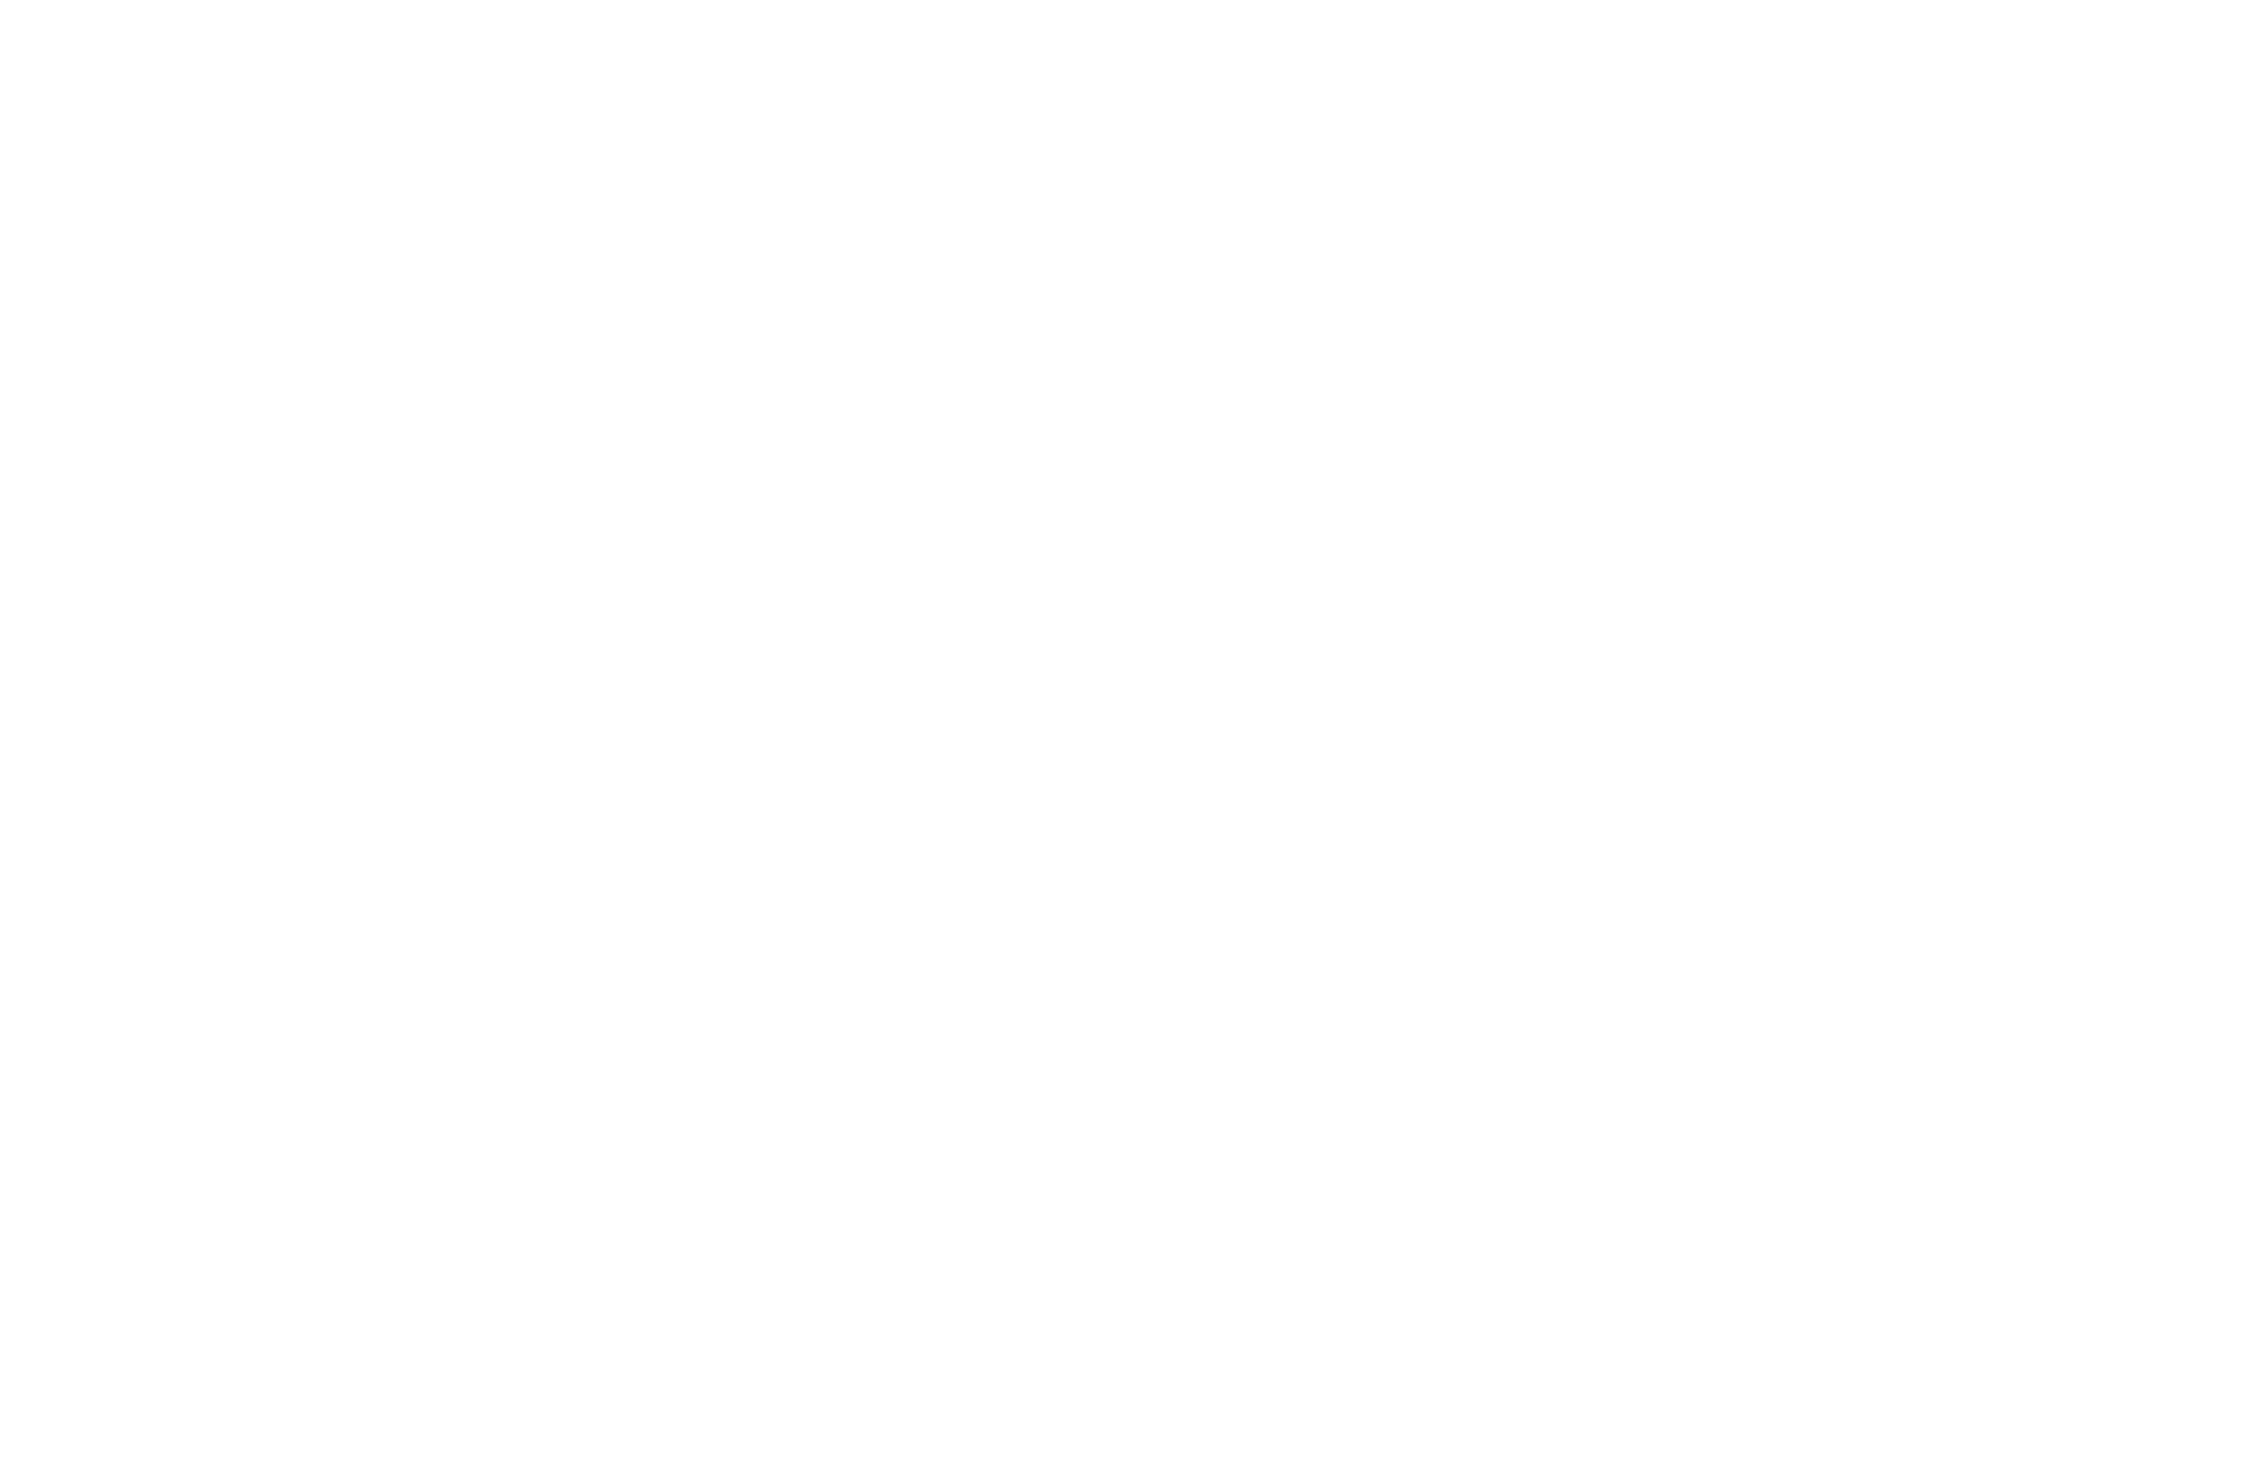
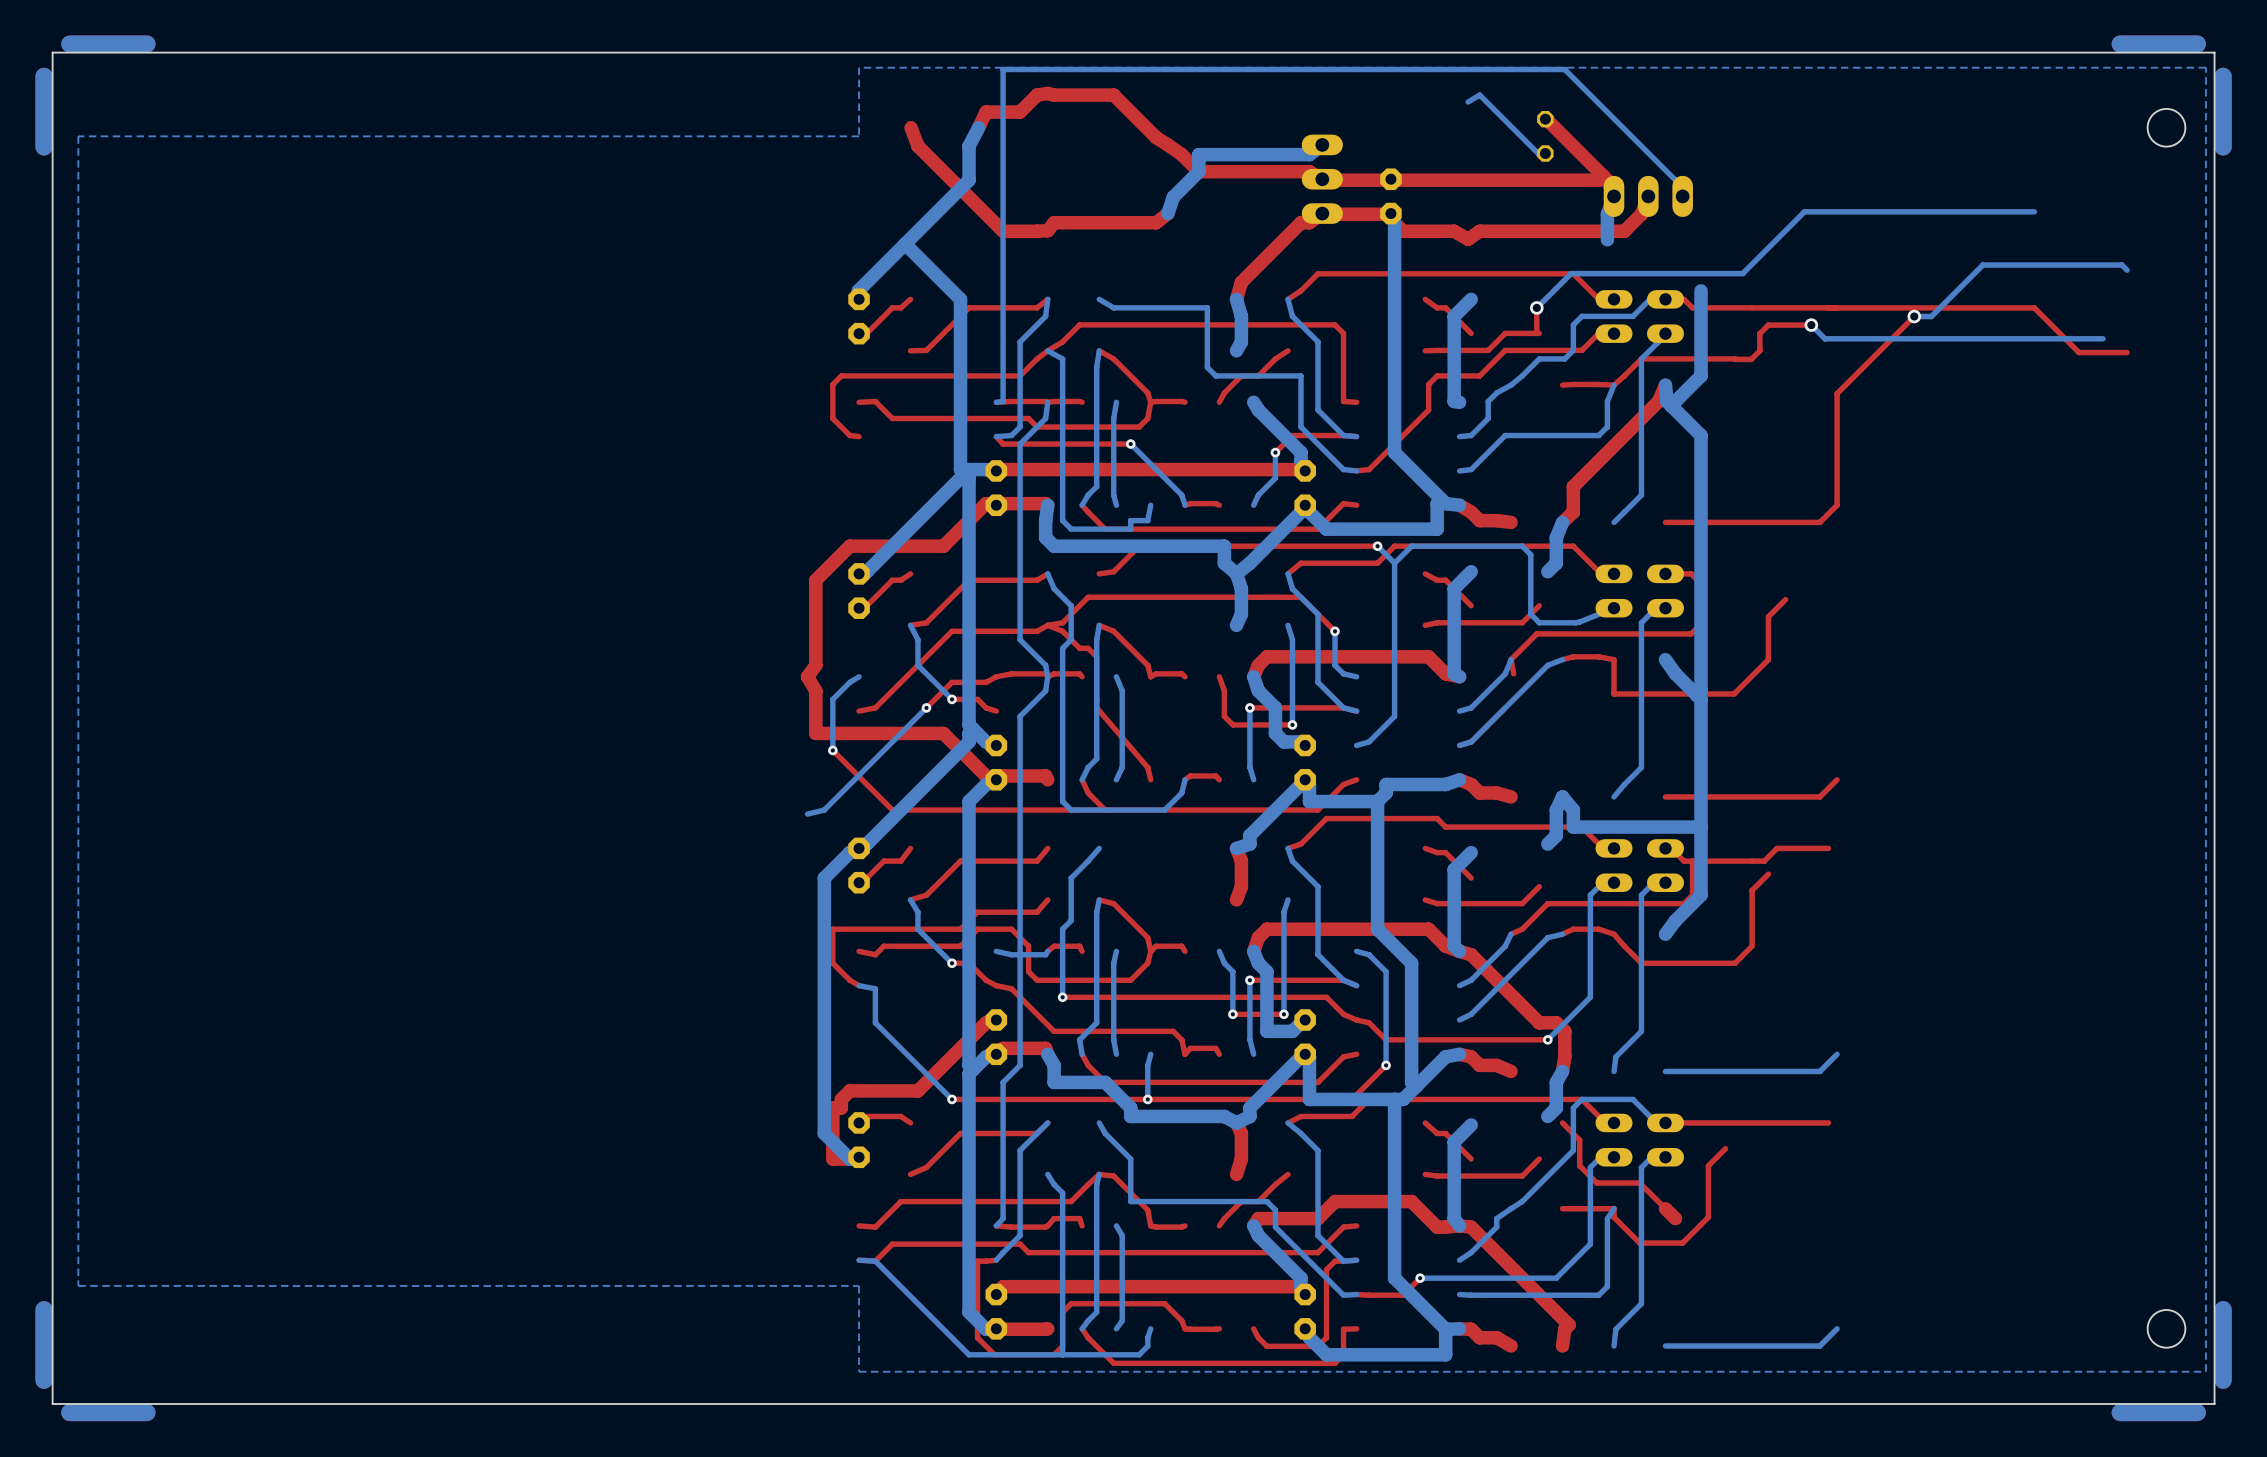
bottom zone outline: none -> (2205, 67) (2205, 1371) (859, 1371) (859, 1285) (78, 1285) (78, 136) (859, 136) (859, 67) (2205, 67)
bottom track: none -> (1468, 102) (1479, 95) (1539, 154) (1545, 153)
top track: none -> (1545, 119) (1607, 180) (1614, 196)
top track: none -> (911, 127) (917, 146) (1003, 231) (1047, 230) (1054, 222) (1156, 222) (1167, 213)
bottom track: none -> (978, 127) (969, 146) (969, 180) (858, 290) (859, 299)
top track: none -> (978, 127) (986, 112) (1020, 112) (1037, 95) (1047, 93) (1113, 95) (1156, 137) (1181, 154) (1198, 171) (1309, 171) (1322, 179) (1335, 180) (1598, 180) (1603, 175)
part: none -> (1545, 136)
bottom track: none -> (1322, 144) (1309, 154) (1198, 154) (1198, 171) (1173, 197) (1167, 213)
part: none -> (1322, 179)
part: none -> (1390, 196)
top track: none -> (1648, 196) (1641, 214) (1624, 231) (1479, 231) (1468, 239) (1454, 231) (1403, 231) (1394, 222) (1390, 213) (1322, 213) (1309, 222) (1300, 222) (1241, 282) (1236, 299)
part: none -> (1648, 196)
bottom track: none -> (1682, 196) (1675, 180) (1564, 69) (1003, 69) (1003, 401) (996, 402)
bottom track: none -> (1615, 205) (1614, 196) (1607, 214) (1607, 239)
bottom track: none -> (2034, 211) (1804, 211) (1742, 273) (1571, 273) (1536, 307)
bottom track: none -> (1390, 213) (1394, 222) (1394, 452) (1445, 503) (1459, 505)
bottom track: none -> (905, 244) (960, 299) (960, 469) (969, 478) (969, 724) (986, 741) (996, 745)
bottom track: none -> (2127, 270) (2121, 265) (1982, 265) (1931, 316) (1914, 316)
bottom track: none -> (1701, 290) (1701, 375) (1671, 405)
top track: none -> (910, 299) (900, 307) (892, 307) (866, 333) (859, 333)
bottom track: none -> (1047, 299) (1045, 316) (1020, 341) (1020, 427) (1011, 435) (996, 436)
top track: none -> (1047, 299) (1037, 307) (969, 307) (926, 350) (910, 350)
bottom track: none -> (1099, 299) (1113, 307) (1207, 307) (1207, 367) (1215, 375) (1300, 375) (1300, 427) (1343, 469) (1356, 470)
bottom track: none -> (1236, 299) (1241, 316) (1241, 341) (1236, 350)
bottom track: none -> (1288, 299) (1292, 316) (1318, 341) (1318, 410) (1343, 435) (1356, 436)
top track: none -> (1425, 299) (1437, 307) (1445, 307) (1471, 333)
bottom track: none -> (1471, 299) (1454, 316) (1454, 401) (1459, 402)
top track: none -> (1614, 299) (1598, 299) (1573, 273) (1318, 273) (1300, 290) (1288, 299)
bottom track: none -> (1665, 299) (1649, 299) (1632, 316) (1581, 316) (1573, 324) (1573, 350) (1564, 358) (1539, 358) (1522, 375) (1496, 392) (1488, 401) (1488, 418) (1471, 435) (1459, 436)
top track: none -> (1665, 299) (1684, 299) (1692, 307) (1837, 307)
top track: none -> (1536, 307) (1536, 333)
via: none -> (1536, 307)
top track: none -> (1828, 307) (2034, 307) (2079, 352) (2127, 352)
part: none -> (859, 316)
part: none -> (1614, 316)
part: none -> (1665, 316)
top track: none -> (1914, 316) (1837, 393) (1837, 505) (1819, 522) (1665, 522)
via: none -> (1914, 316)
bottom track: none -> (1811, 325) (1825, 338) (2103, 338)
top track: none -> (1811, 325) (1768, 325) (1759, 333) (1759, 350) (1751, 359) (1641, 358) (1614, 385) (1562, 385)
via: none -> (1811, 325)
top track: none -> (1539, 333) (1505, 333) (1488, 350) (1425, 350)
top track: none -> (1614, 333) (1598, 333) (1581, 350) (1505, 350) (1479, 375) (1437, 375) (1428, 384) (1428, 410) (1369, 469) (1356, 470)
bottom track: none -> (1665, 333) (1641, 358) (1641, 495) (1614, 522)
bottom track: none -> (1047, 350) (1062, 358) (1062, 520) (1071, 529) (1130, 529) (1130, 520) (1147, 520) (1150, 505)
bottom track: none -> (1099, 350) (1096, 367) (1096, 486) (1082, 505)
top track: none -> (1099, 350) (1113, 358) (1147, 392) (1150, 402)
top track: none -> (1288, 350) (1275, 358) (1258, 375) (1241, 375) (1224, 392) (1219, 402)
bottom track: none -> (1614, 385) (1607, 401) (1607, 426) (1598, 435) (1505, 435) (1471, 469) (1459, 470)
bottom track: none -> (1665, 385) (1666, 401) (1701, 435) (1701, 690) (1696, 695)
top track: none -> (1665, 385) (1658, 401) (1573, 486) (1573, 512) (1562, 522)
bottom track: none -> (1047, 402) (1045, 418) (1020, 444) (1020, 639) (1045, 665) (1047, 676) (1045, 690) (1020, 716) (1020, 1065) (1003, 1082) (1003, 1218) (996, 1225)
top track: none -> (1082, 402) (996, 402)
bottom track: none -> (1116, 402) (1113, 418) (1113, 495) (1116, 505)
top track: none -> (1150, 402) (1147, 418) (1139, 427) (1037, 427) (1028, 418) (892, 418) (875, 401) (859, 402)
top track: none -> (1185, 402) (1150, 402)
bottom track: none -> (1253, 402) (1258, 410) (1300, 452) (1300, 461) (1305, 470)
top track: none -> (1356, 402) (1343, 401) (1343, 333) (1334, 324) (1079, 324) (1062, 341) (1037, 358) (1020, 375) (841, 375) (832, 384) (832, 418) (849, 435) (859, 436)
top track: none -> (996, 436) (1003, 444) (1130, 444)
top track: none -> (1356, 436) (1292, 435) (1275, 452)
bottom track: none -> (1130, 444) (1181, 495) (1185, 505)
via: none -> (1130, 444)
bottom track: none -> (1275, 452) (1275, 478) (1258, 495) (1253, 505)
via: none -> (1275, 452)
bottom track: none -> (996, 470) (969, 469) (866, 571) (859, 573)
top track: none -> (1305, 470) (996, 470)
part: none -> (996, 488)
part: none -> (1305, 488)
bottom track: none -> (1441, 499) (1437, 503) (1437, 529) (1326, 529) (1305, 505) (1300, 512) (1249, 563) (1236, 573)
bottom track: none -> (1047, 505) (1045, 537) (1054, 546) (1224, 546) (1224, 563) (1236, 573)
top track: none -> (1047, 505) (1045, 503) (996, 505) (986, 503) (943, 546) (849, 546) (815, 580) (815, 665) (807, 676) (815, 690) (815, 733) (943, 733) (986, 776) (996, 779) (1003, 776) (1045, 776) (1047, 779)
top track: none -> (1219, 505) (1215, 503) (1185, 505)
top track: none -> (1356, 505) (1343, 503) (1318, 529) (1105, 529) (1082, 505)
top track: none -> (1459, 505) (1471, 512) (1479, 520) (1511, 522)
bottom track: none -> (1562, 522) (1556, 537) (1556, 563) (1547, 571)
bottom track: none -> (1377, 546) (1394, 563)
top track: none -> (1377, 546) (1139, 546) (1113, 571) (1099, 573)
via: none -> (1377, 546)
bottom track: none -> (1394, 563) (1394, 716) (1369, 741) (1356, 745)
bottom track: none -> (1394, 563) (1411, 546) (1522, 546) (1530, 554) (1530, 614) (1539, 622) (1579, 622) (1614, 608)
bottom track: none -> (1471, 571) (1454, 588) (1454, 673) (1459, 676)
top track: none -> (910, 573) (900, 580) (892, 580) (866, 605) (859, 608)
bottom track: none -> (1047, 573) (1054, 588) (1071, 605) (1071, 639) (1062, 648) (1062, 801) (1071, 810) (1164, 810) (1181, 793) (1185, 779)
top track: none -> (1047, 573) (1037, 580) (969, 580) (926, 622) (910, 625)
bottom track: none -> (1236, 573) (1241, 588) (1241, 614) (1236, 625)
bottom track: none -> (1288, 573) (1292, 588) (1318, 614) (1318, 682) (1343, 707) (1356, 711)
top track: none -> (1425, 573) (1437, 580) (1445, 580) (1471, 605)
top track: none -> (1614, 573) (1598, 571) (1573, 546) (1394, 546) (1377, 563) (1300, 563) (1288, 573)
top track: none -> (1665, 573) (1691, 573) (1699, 582) (1699, 625) (1691, 633) (1536, 633) (1511, 659) (1513, 673)
part: none -> (859, 591)
part: none -> (1614, 591)
part: none -> (1665, 591)
top track: none -> (1785, 599) (1768, 616) (1768, 659) (1734, 693) (1614, 693) (1614, 659) (1598, 656) (1573, 656) (1562, 659)
top track: none -> (1539, 605) (1522, 622) (1437, 622) (1425, 625)
bottom track: none -> (1665, 608) (1649, 614) (1641, 622) (1641, 767) (1614, 796)
bottom track: none -> (910, 625) (917, 639) (917, 665) (952, 699)
top track: none -> (1047, 625) (1037, 631) (952, 631) (875, 707) (859, 711)
top track: none -> (1047, 625) (1062, 631) (1079, 648) (1088, 648) (1096, 656) (1096, 699)
top track: none -> (1047, 625) (1062, 622) (1088, 597) (1300, 597) (1335, 631)
bottom track: none -> (1099, 625) (1096, 639) (1096, 758) (1088, 767) (1082, 779)
top track: none -> (1099, 625) (1113, 631) (1147, 665) (1150, 676) (1156, 673) (1181, 673) (1185, 676)
bottom track: none -> (1288, 625) (1292, 639) (1292, 724)
bottom track: none -> (1335, 631) (1335, 665) (1343, 673) (1356, 676)
via: none -> (1335, 631)
bottom track: none -> (1511, 659) (1505, 673) (1471, 707) (1459, 711)
bottom track: none -> (1562, 659) (1547, 665) (1471, 741) (1459, 745)
bottom track: none -> (1665, 659) (1675, 673) (1701, 699) (1701, 895) (1675, 920) (1665, 934)
bottom track: none -> (859, 676) (849, 682) (832, 699) (832, 750)
top track: none -> (1082, 676) (1079, 673) (1054, 673) (1047, 676) (1045, 673) (1011, 673) (996, 676) (986, 682) (952, 682) (926, 707)
bottom track: none -> (1116, 676) (1122, 690) (1122, 767) (1116, 779)
top track: none -> (1219, 676) (1224, 690) (1224, 716) (1232, 724) (1292, 724)
bottom track: none -> (1253, 676) (1258, 690) (1275, 707) (1275, 733) (1283, 741) (1300, 741) (1305, 745)
top track: none -> (1459, 676) (1445, 673) (1428, 656) (1266, 656) (1258, 665) (1253, 676)
top track: none -> (952, 699) (977, 699) (986, 707) (996, 711)
via: none -> (952, 699)
top track: none -> (1096, 699) (1096, 707) (1147, 767) (1150, 779)
bottom track: none -> (926, 707) (824, 810) (807, 814)
via: none -> (926, 707)
bottom track: none -> (1249, 707) (1249, 767) (1253, 779)
top track: none -> (1249, 707) (1343, 707) (1356, 711)
via: none -> (1249, 707)
via: none -> (1292, 724)
part: none -> (1133, 728)
bottom track: none -> (973, 729) (969, 733) (969, 741) (866, 844) (849, 852) (824, 878) (824, 1133) (849, 1159) (859, 1157)
top track: none -> (832, 750) (892, 810) (1318, 810) (1343, 784) (1356, 779)
via: none -> (832, 750)
part: none -> (996, 762)
part: none -> (1305, 762)
bottom track: none -> (996, 779) (986, 784) (969, 801) (969, 1065) (973, 1069)
top track: none -> (1082, 779) (1088, 793) (1105, 810)
top track: none -> (1219, 779) (1215, 776) (1190, 776) (1185, 779)
bottom track: none -> (1459, 779) (1445, 784) (1386, 784) (1386, 793) (1377, 801)
top track: none -> (1459, 779) (1471, 784) (1479, 793) (1496, 793) (1511, 796)
top track: none -> (1837, 779) (1819, 796) (1665, 796)
bottom track: none -> (1377, 801) (1309, 801) (1309, 784) (1305, 779) (1249, 835) (1249, 844) (1236, 848)
bottom track: none -> (1377, 801) (1377, 929) (1411, 963) (1411, 1082) (1415, 1086)
bottom track: none -> (1701, 827) (1573, 827) (1573, 810) (1562, 796) (1556, 810) (1556, 835) (1547, 844)
top track: none -> (910, 848) (900, 861) (883, 861) (866, 878) (859, 882)
top track: none -> (1047, 848) (1037, 861) (960, 861) (926, 895) (910, 899)
bottom track: none -> (1099, 848) (1071, 878) (1071, 920) (1062, 929) (1062, 997)
top track: none -> (1236, 848) (1241, 861) (1241, 886) (1236, 899)
bottom track: none -> (1288, 848) (1292, 861) (1318, 886) (1318, 954) (1343, 980) (1356, 985)
top track: none -> (1425, 848) (1437, 852) (1445, 852) (1471, 878)
top track: none -> (1614, 848) (1598, 844) (1581, 827) (1445, 827) (1437, 818) (1326, 818) (1300, 844) (1288, 848)
top track: none -> (1828, 848) (1777, 848) (1764, 861) (1684, 861) (1675, 852) (1665, 848)
bottom track: none -> (1471, 852) (1454, 869) (1454, 946) (1459, 951)
top track: none -> (1692, 861) (1692, 895) (1683, 903) (1547, 903) (1522, 929) (1511, 934)
part: none -> (859, 865)
part: none -> (1614, 865)
part: none -> (1665, 865)
top track: none -> (1768, 874) (1752, 890) (1752, 946) (1735, 963) (1641, 963) (1614, 934) (1598, 929) (1573, 929) (1562, 934)
bottom track: none -> (1614, 882) (1598, 886) (1590, 895) (1590, 997) (1547, 1039)
bottom track: none -> (1665, 882) (1649, 886) (1641, 895) (1641, 1031) (1615, 1056) (1614, 1071)
top track: none -> (1539, 886) (1522, 903) (1437, 903) (1425, 899)
bottom track: none -> (910, 899) (917, 912) (917, 929) (952, 963)
top track: none -> (1047, 899) (1037, 912) (977, 912) (960, 929) (832, 929) (832, 963) (849, 980) (859, 985)
bottom track: none -> (1099, 899) (1096, 912) (1096, 1022) (1079, 1039) (1082, 1054)
top track: none -> (1099, 899) (1113, 903) (1147, 937) (1150, 951)
bottom track: none -> (1288, 899) (1283, 912) (1283, 1014)
bottom track: none -> (1511, 934) (1505, 946) (1471, 980) (1459, 985)
bottom track: none -> (1562, 934) (1547, 937) (1471, 1014) (1459, 1020)
bottom track: none -> (1047, 951) (1045, 954) (1011, 954) (996, 951)
top track: none -> (1082, 951) (1079, 946) (1054, 946) (1047, 951)
bottom track: none -> (1116, 951) (1113, 963) (1113, 1039) (1116, 1054)
top track: none -> (1150, 951) (1147, 963) (1130, 980) (1037, 980) (1028, 971) (1028, 946) (1011, 929) (977, 929) (960, 946) (883, 946) (875, 954) (859, 951)
top track: none -> (1185, 951) (1181, 946) (1156, 946) (1150, 951)
bottom track: none -> (1219, 951) (1224, 963) (1232, 971) (1232, 1014)
bottom track: none -> (1253, 951) (1258, 963) (1266, 971) (1266, 1031) (1292, 1031) (1305, 1020)
top track: none -> (1253, 951) (1258, 937) (1266, 929) (1428, 929) (1445, 946) (1471, 954) (1539, 1022) (1556, 1022) (1564, 1031) (1562, 1071)
bottom track: none -> (1356, 951) (1369, 954) (1386, 971) (1386, 1065)
top track: none -> (952, 963) (969, 963) (986, 980) (996, 985) (1011, 988) (1054, 1031) (1173, 1031) (1181, 1039) (1185, 1054) (1190, 1048) (1215, 1048) (1219, 1054)
via: none -> (952, 963)
bottom track: none -> (1249, 980) (1249, 1039) (1253, 1054)
top track: none -> (1249, 980) (1343, 980) (1356, 985)
via: none -> (1249, 980)
bottom track: none -> (859, 985) (875, 988) (875, 1022) (952, 1099)
top track: none -> (1062, 997) (1326, 997) (1343, 1014) (1369, 1022) (1386, 1039) (1547, 1039)
via: none -> (1062, 997)
via: none -> (1232, 1014)
top track: none -> (1283, 1014) (1232, 1014)
via: none -> (1283, 1014)
top track: none -> (996, 1020) (986, 1022) (917, 1090) (849, 1090) (841, 1099) (841, 1107) (832, 1107) (832, 1159) (859, 1157)
part: none -> (996, 1037)
part: none -> (1305, 1037)
via: none -> (1547, 1039)
bottom track: none -> (996, 1054) (986, 1056) (969, 1073) (969, 1312) (986, 1329) (996, 1328)
top track: none -> (1047, 1054) (1045, 1048) (1003, 1048) (996, 1054)
bottom track: none -> (1150, 1054) (1147, 1065) (1147, 1099)
top track: none -> (1356, 1054) (1343, 1056) (1318, 1082) (1105, 1082) (1088, 1065) (1082, 1054)
bottom track: none -> (1459, 1054) (1445, 1056) (1403, 1099) (1309, 1099) (1309, 1056) (1305, 1054) (1249, 1107) (1249, 1116) (1236, 1122) (1224, 1116) (1130, 1116) (1130, 1107) (1105, 1082) (1054, 1082) (1054, 1065) (1047, 1054)
top track: none -> (1459, 1054) (1471, 1056) (1479, 1065) (1496, 1065) (1511, 1071)
bottom track: none -> (1837, 1054) (1819, 1071) (1665, 1071)
top track: none -> (1386, 1065) (1352, 1099) (952, 1099)
via: none -> (1386, 1065)
bottom track: none -> (1562, 1071) (1556, 1082) (1556, 1107) (1547, 1116)
via: none -> (952, 1099)
via: none -> (1147, 1099)
bottom track: none -> (1394, 1099) (1394, 1278) (1445, 1329)
top track: none -> (910, 1122) (900, 1116) (866, 1116) (859, 1122)
bottom track: none -> (1047, 1122) (1020, 1150) (1020, 1235) (996, 1260)
top track: none -> (1047, 1122) (1037, 1133) (960, 1133) (926, 1167) (910, 1174)
bottom track: none -> (1099, 1122) (1105, 1133) (1130, 1159) (1130, 1201) (1266, 1201) (1275, 1210) (1275, 1227) (1343, 1295) (1356, 1294)
top track: none -> (1236, 1122) (1241, 1133) (1241, 1159) (1236, 1174)
bottom track: none -> (1288, 1122) (1318, 1150) (1318, 1235) (1343, 1261) (1356, 1260)
top track: none -> (1425, 1122) (1437, 1133) (1445, 1133) (1471, 1159)
top track: none -> (1562, 1122) (1579, 1140) (1579, 1165) (1596, 1183) (1639, 1183) (1675, 1218)
top track: none -> (1614, 1122) (1598, 1116) (1581, 1099) (1369, 1099) (1352, 1116) (1300, 1116) (1288, 1122)
bottom track: none -> (1665, 1122) (1649, 1116) (1632, 1099) (1581, 1099) (1573, 1108) (1573, 1150) (1522, 1201) (1496, 1218) (1496, 1227) (1471, 1252) (1459, 1260)
top track: none -> (1828, 1122) (1665, 1122)
bottom track: none -> (1471, 1124) (1454, 1141) (1454, 1218) (1459, 1225)
part: none -> (859, 1140)
part: none -> (1614, 1140)
part: none -> (1665, 1140)
top track: none -> (1725, 1148) (1708, 1165) (1708, 1217) (1682, 1243) (1639, 1243) (1614, 1217) (1614, 1208) (1562, 1208)
bottom track: none -> (1614, 1157) (1598, 1159) (1590, 1167) (1590, 1244) (1556, 1278) (1420, 1278)
bottom track: none -> (1665, 1157) (1649, 1159) (1641, 1167) (1641, 1303) (1615, 1329) (1614, 1346)
top track: none -> (1539, 1159) (1522, 1176) (1425, 1174)
bottom track: none -> (1047, 1174) (1062, 1193) (1062, 1354)
bottom track: none -> (1099, 1174) (1096, 1184) (1096, 1312) (1082, 1328)
top track: none -> (1288, 1174) (1258, 1201) (1241, 1201) (1219, 1225)
bottom track: none -> (1614, 1208) (1607, 1218) (1607, 1286) (1598, 1295) (1459, 1294)
top track: none -> (1082, 1225) (1079, 1218) (1054, 1218) (1045, 1227) (996, 1225)
bottom track: none -> (1116, 1225) (1122, 1235) (1122, 1320) (1116, 1328)
top track: none -> (1185, 1225) (1150, 1225) (1147, 1210) (1113, 1176) (1099, 1174) (1071, 1201) (900, 1201) (875, 1227) (859, 1225)
bottom track: none -> (1253, 1225) (1258, 1235) (1300, 1278) (1300, 1286) (1305, 1294)
top track: none -> (1253, 1225) (1258, 1218) (1318, 1218) (1335, 1201) (1411, 1201) (1437, 1227) (1471, 1227) (1569, 1324) (1564, 1329) (1562, 1346)
top track: none -> (1356, 1225) (1343, 1227) (1318, 1252) (1028, 1252) (1020, 1244) (892, 1244) (875, 1261) (859, 1260)
bottom track: none -> (859, 1260) (875, 1261) (969, 1354) (1139, 1354) (1147, 1346) (1150, 1328)
top track: none -> (996, 1260) (977, 1261) (977, 1337) (994, 1354) (1054, 1354) (1062, 1346) (1062, 1312) (1071, 1303) (1164, 1303) (1181, 1320) (1185, 1328) (1219, 1328)
top track: none -> (1356, 1260) (1335, 1261) (1326, 1269) (1326, 1337) (1318, 1346) (1266, 1346) (1258, 1337) (1253, 1328)
top track: none -> (1420, 1278) (1403, 1295) (1356, 1294)
via: none -> (1420, 1278)
top track: none -> (1305, 1294) (1300, 1286) (1003, 1286) (996, 1294)
part: none -> (996, 1311)
part: none -> (1305, 1311)
top track: none -> (1047, 1328) (996, 1328)
bottom track: none -> (1305, 1328) (1309, 1337) (1326, 1354) (1445, 1354) (1445, 1329)
top track: none -> (1356, 1328) (1343, 1329) (1343, 1354) (1334, 1363) (1113, 1363) (1088, 1337) (1082, 1328)
bottom track: none -> (1459, 1328) (1445, 1329)
top track: none -> (1459, 1328) (1471, 1329) (1479, 1337) (1496, 1337) (1511, 1346)
bottom track: none -> (1837, 1328) (1819, 1346) (1665, 1346)

